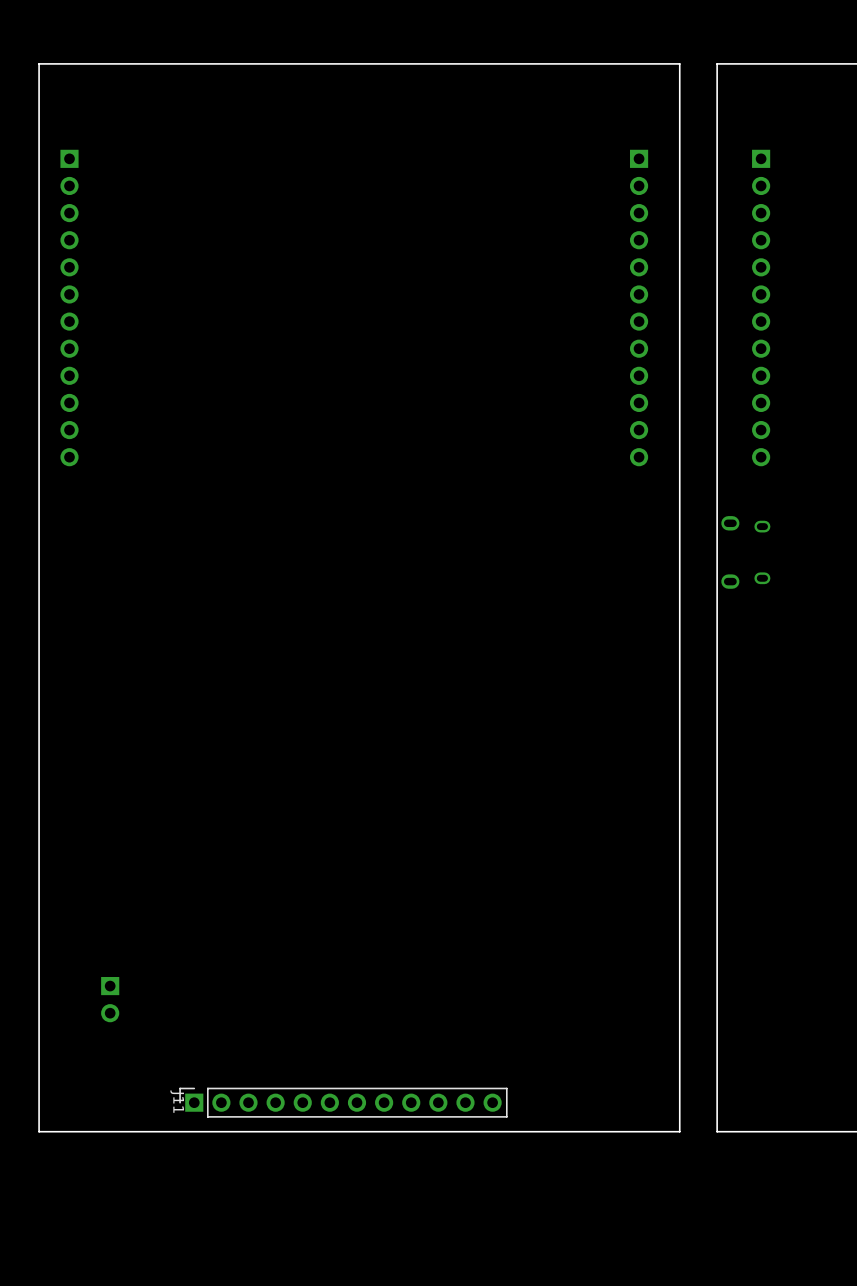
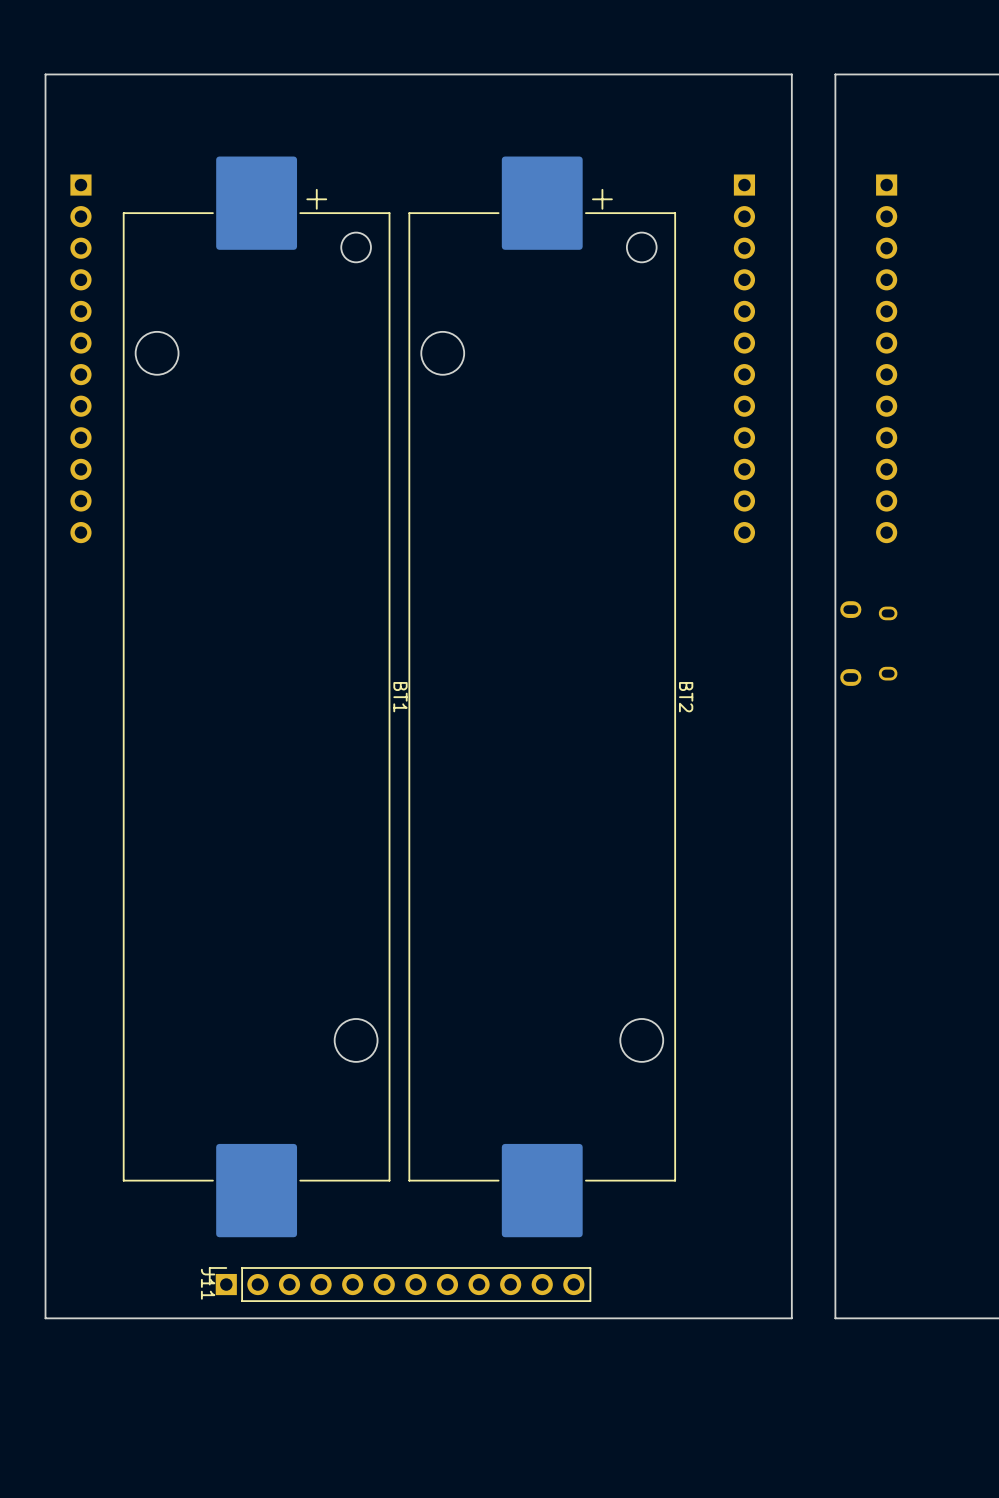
BT1: none -> (256, 696)
BT2: none -> (542, 696)
part: (110, 999) -> none

